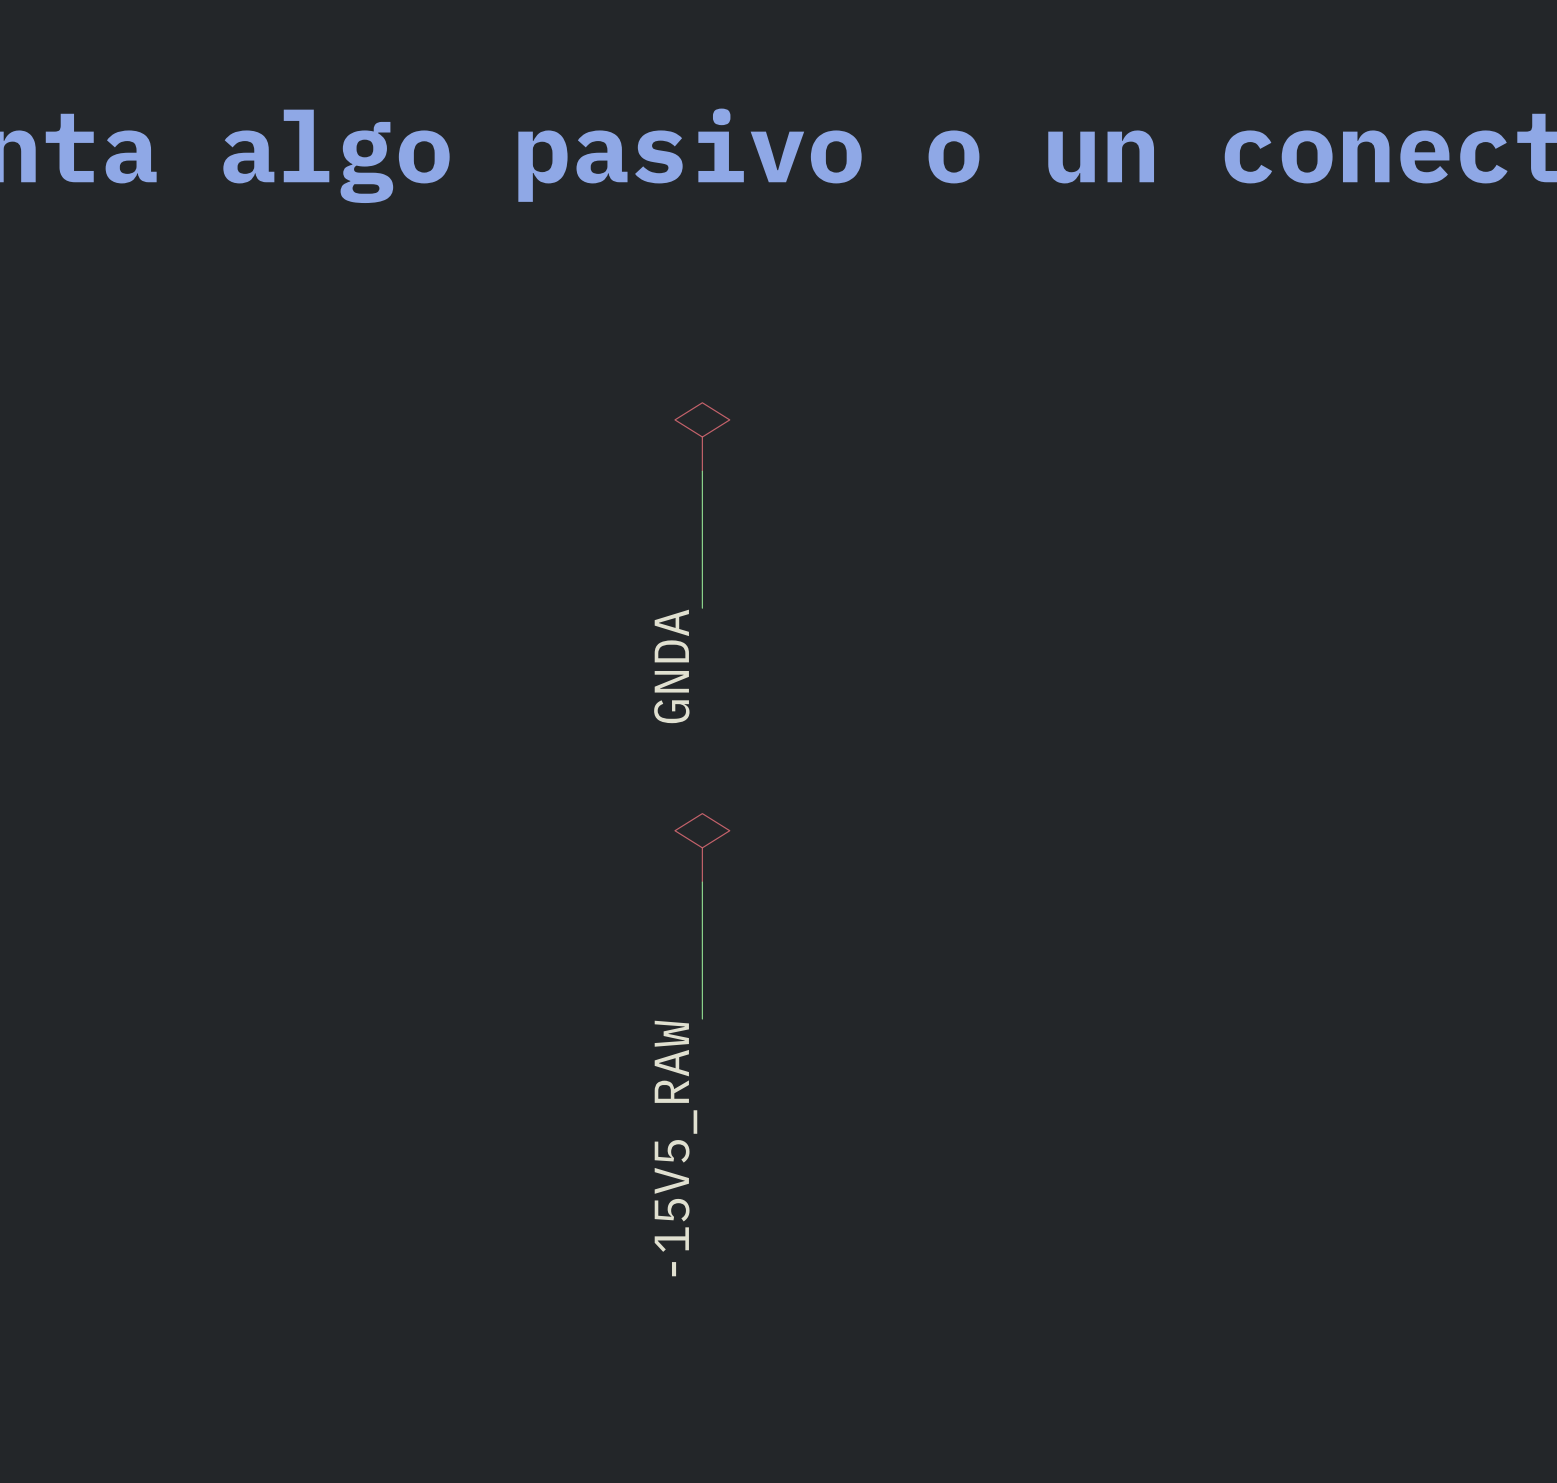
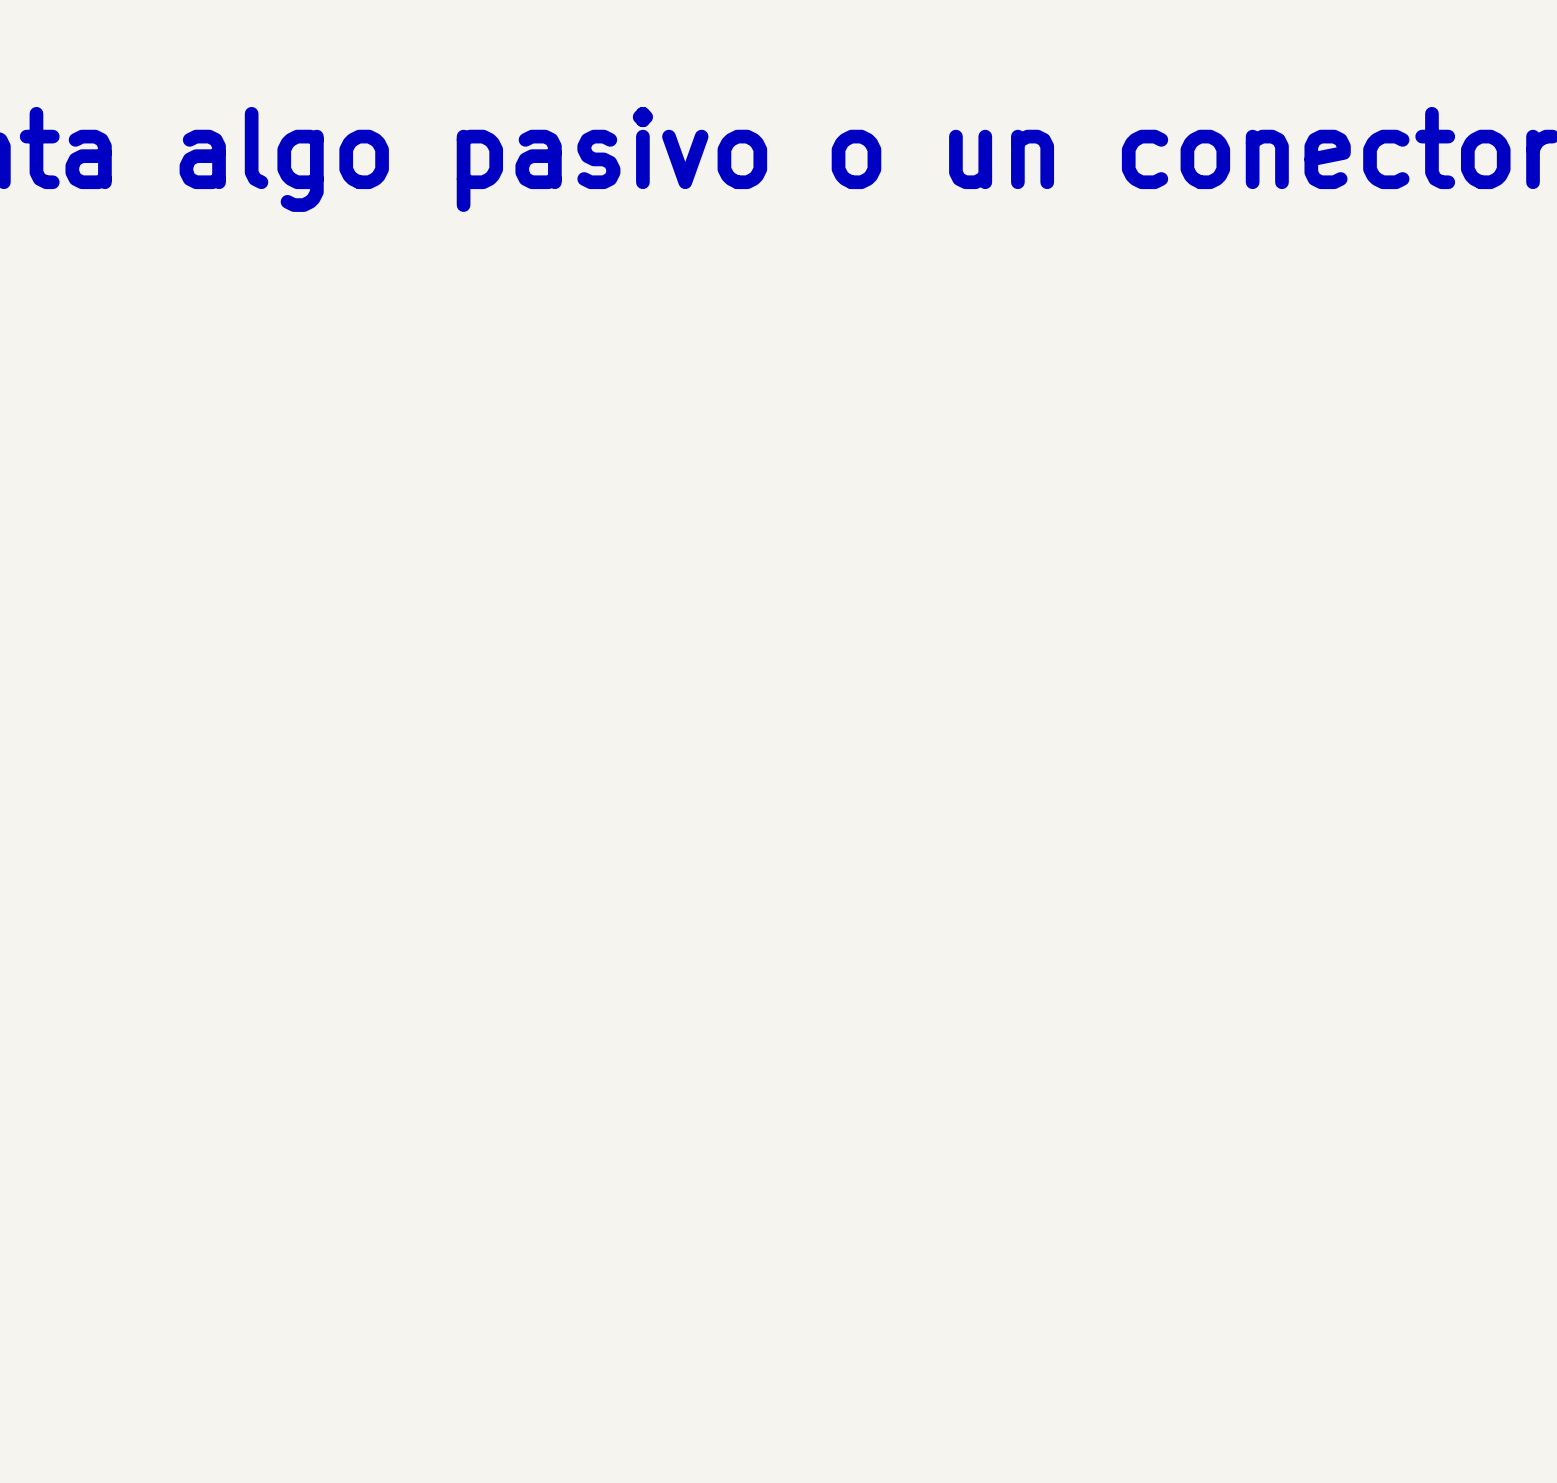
power symbol: (702, 437) -> none
wire: (702, 471) (702, 608) -> none
label: GNDA (671, 666) -> none
power symbol: (702, 847) -> none
wire: (702, 882) (702, 1019) -> none
label: -15V5_RAW (675, 1148) -> none

